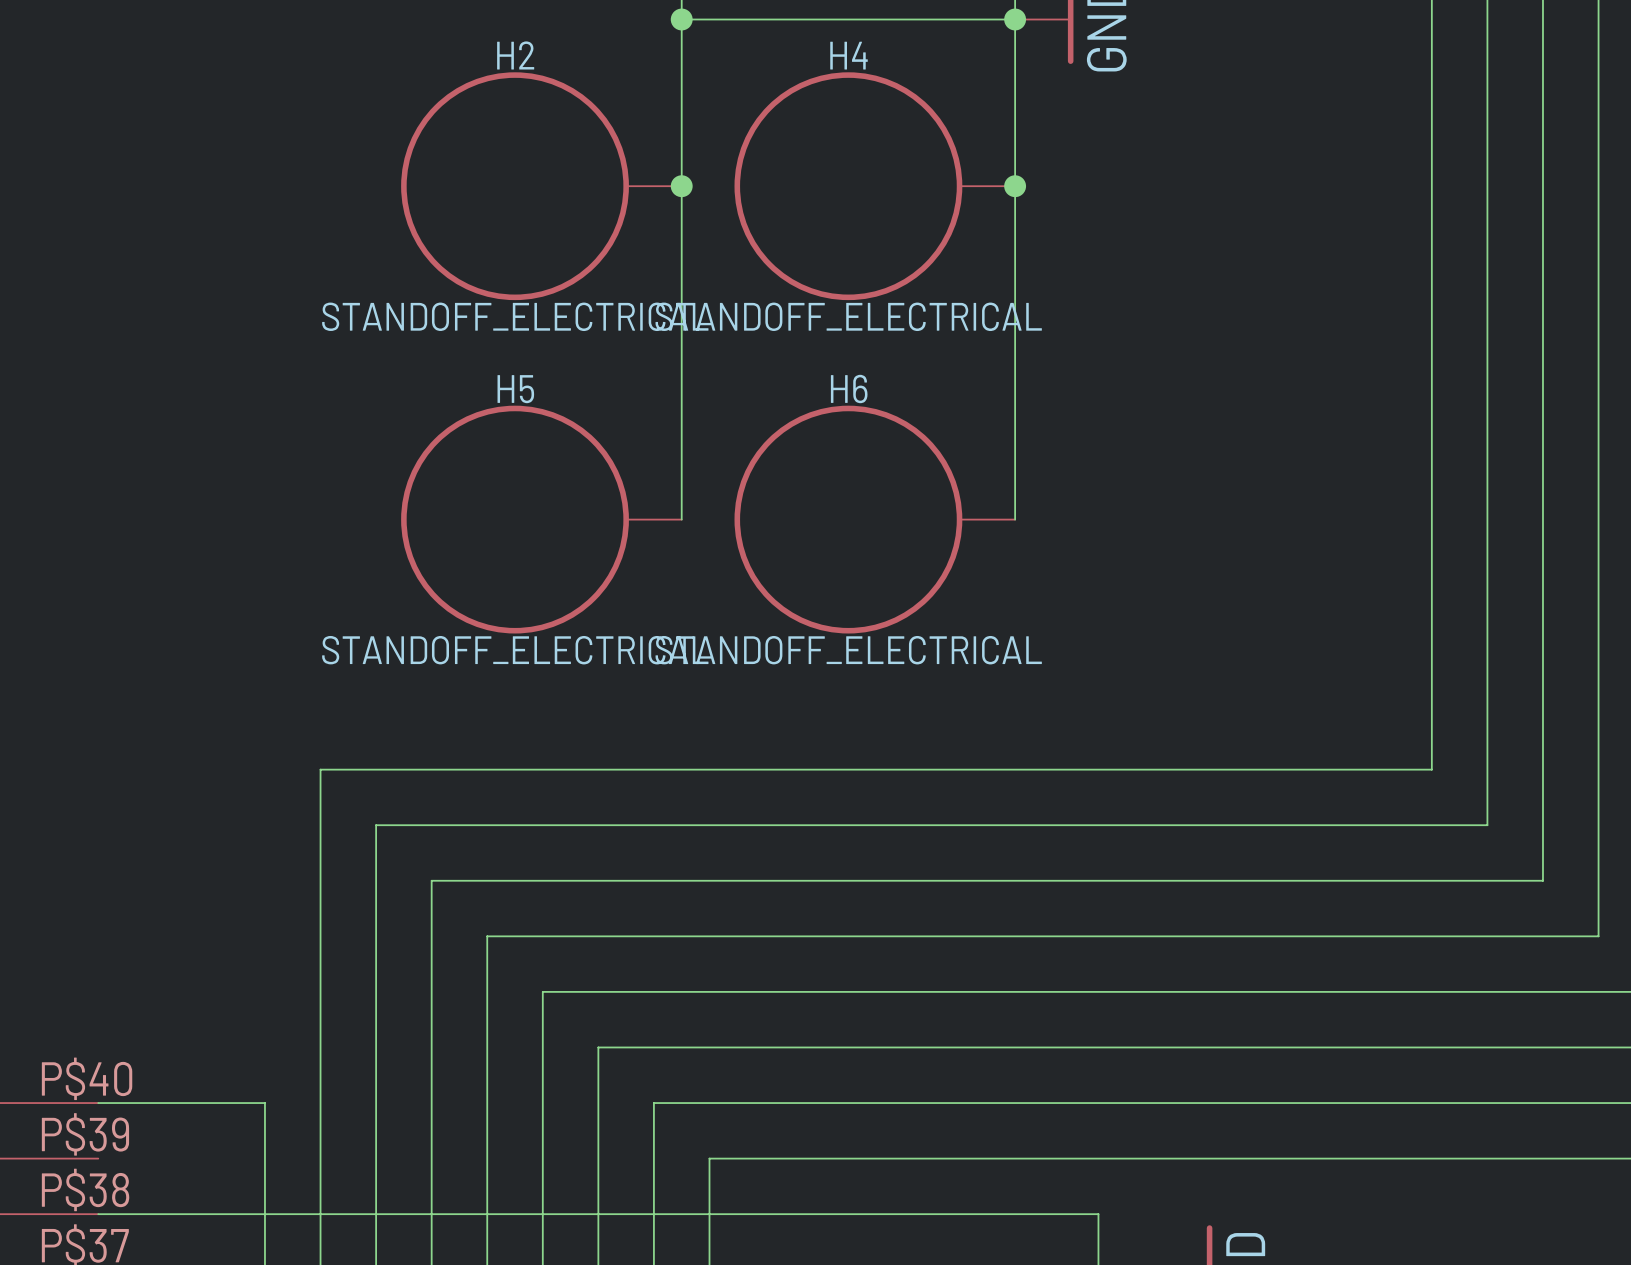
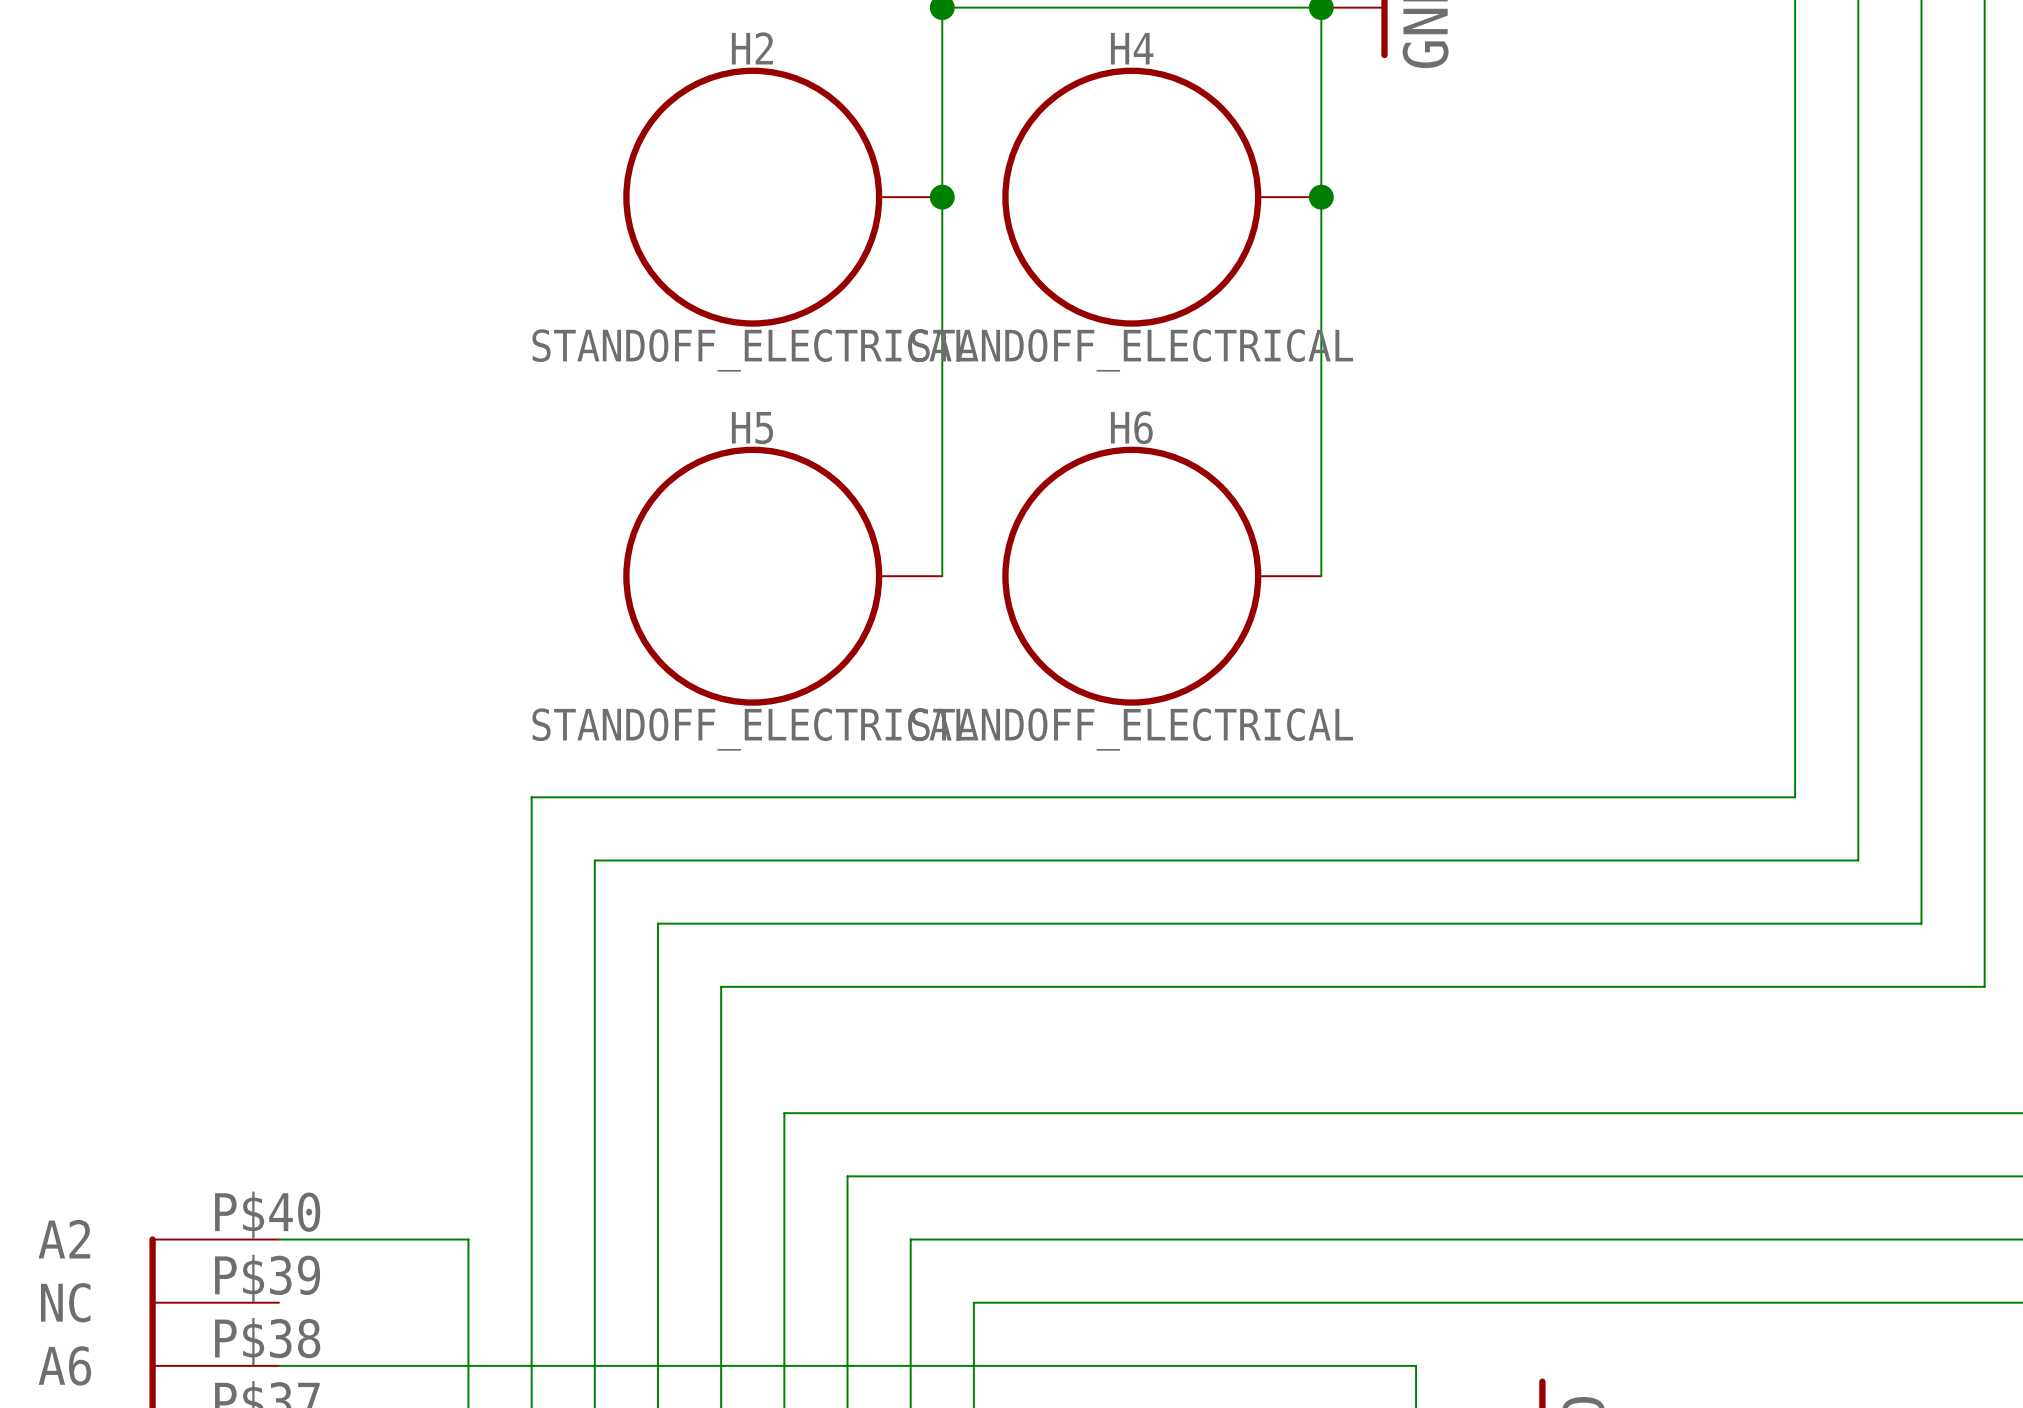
wire: (1431, 714) (1431, 769) -> (1858, 860) (1795, 860)
wire: none -> (1795, 797) (531, 797) (531, 860)
wire: (320, 769) (376, 769) -> (594, 923) (594, 860)
wire: (1487, 769) (1487, 825) -> none
wire: (376, 825) (431, 825) -> (657, 986) (657, 923)
wire: (1542, 825) (1542, 880) -> (1921, 923) (1858, 923)
wire: (431, 880) (487, 880) -> (721, 1050) (721, 986)
wire: (1598, 880) (1598, 936) (487, 936) -> (1984, 986) (1921, 986)

